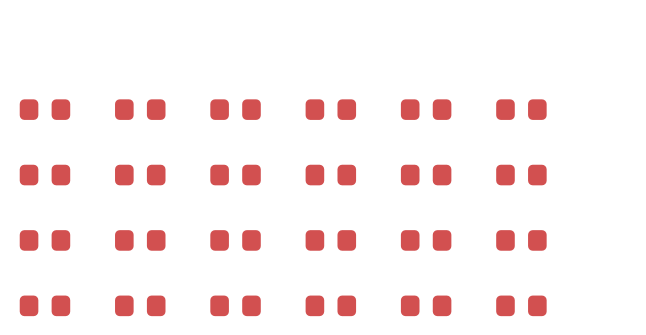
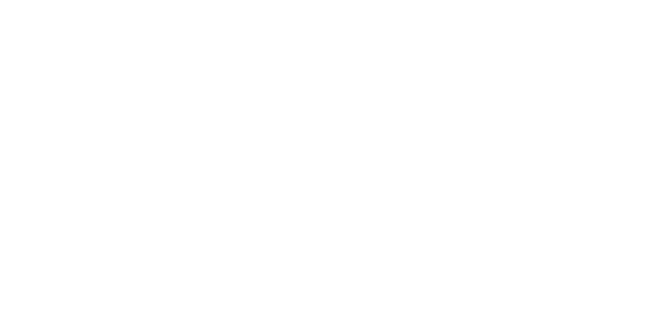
part: (44, 109) -> none
part: (140, 109) -> none
part: (235, 109) -> none
part: (330, 109) -> none
part: (426, 109) -> none
part: (521, 109) -> none
part: (44, 175) -> none
part: (140, 175) -> none
part: (235, 175) -> none
part: (330, 175) -> none
part: (426, 175) -> none
part: (521, 175) -> none
part: (44, 240) -> none
part: (140, 240) -> none
part: (235, 240) -> none
part: (330, 240) -> none
part: (426, 240) -> none
part: (521, 240) -> none
part: (44, 305) -> none
part: (140, 305) -> none
part: (235, 305) -> none
part: (330, 305) -> none
part: (426, 305) -> none
part: (521, 305) -> none

